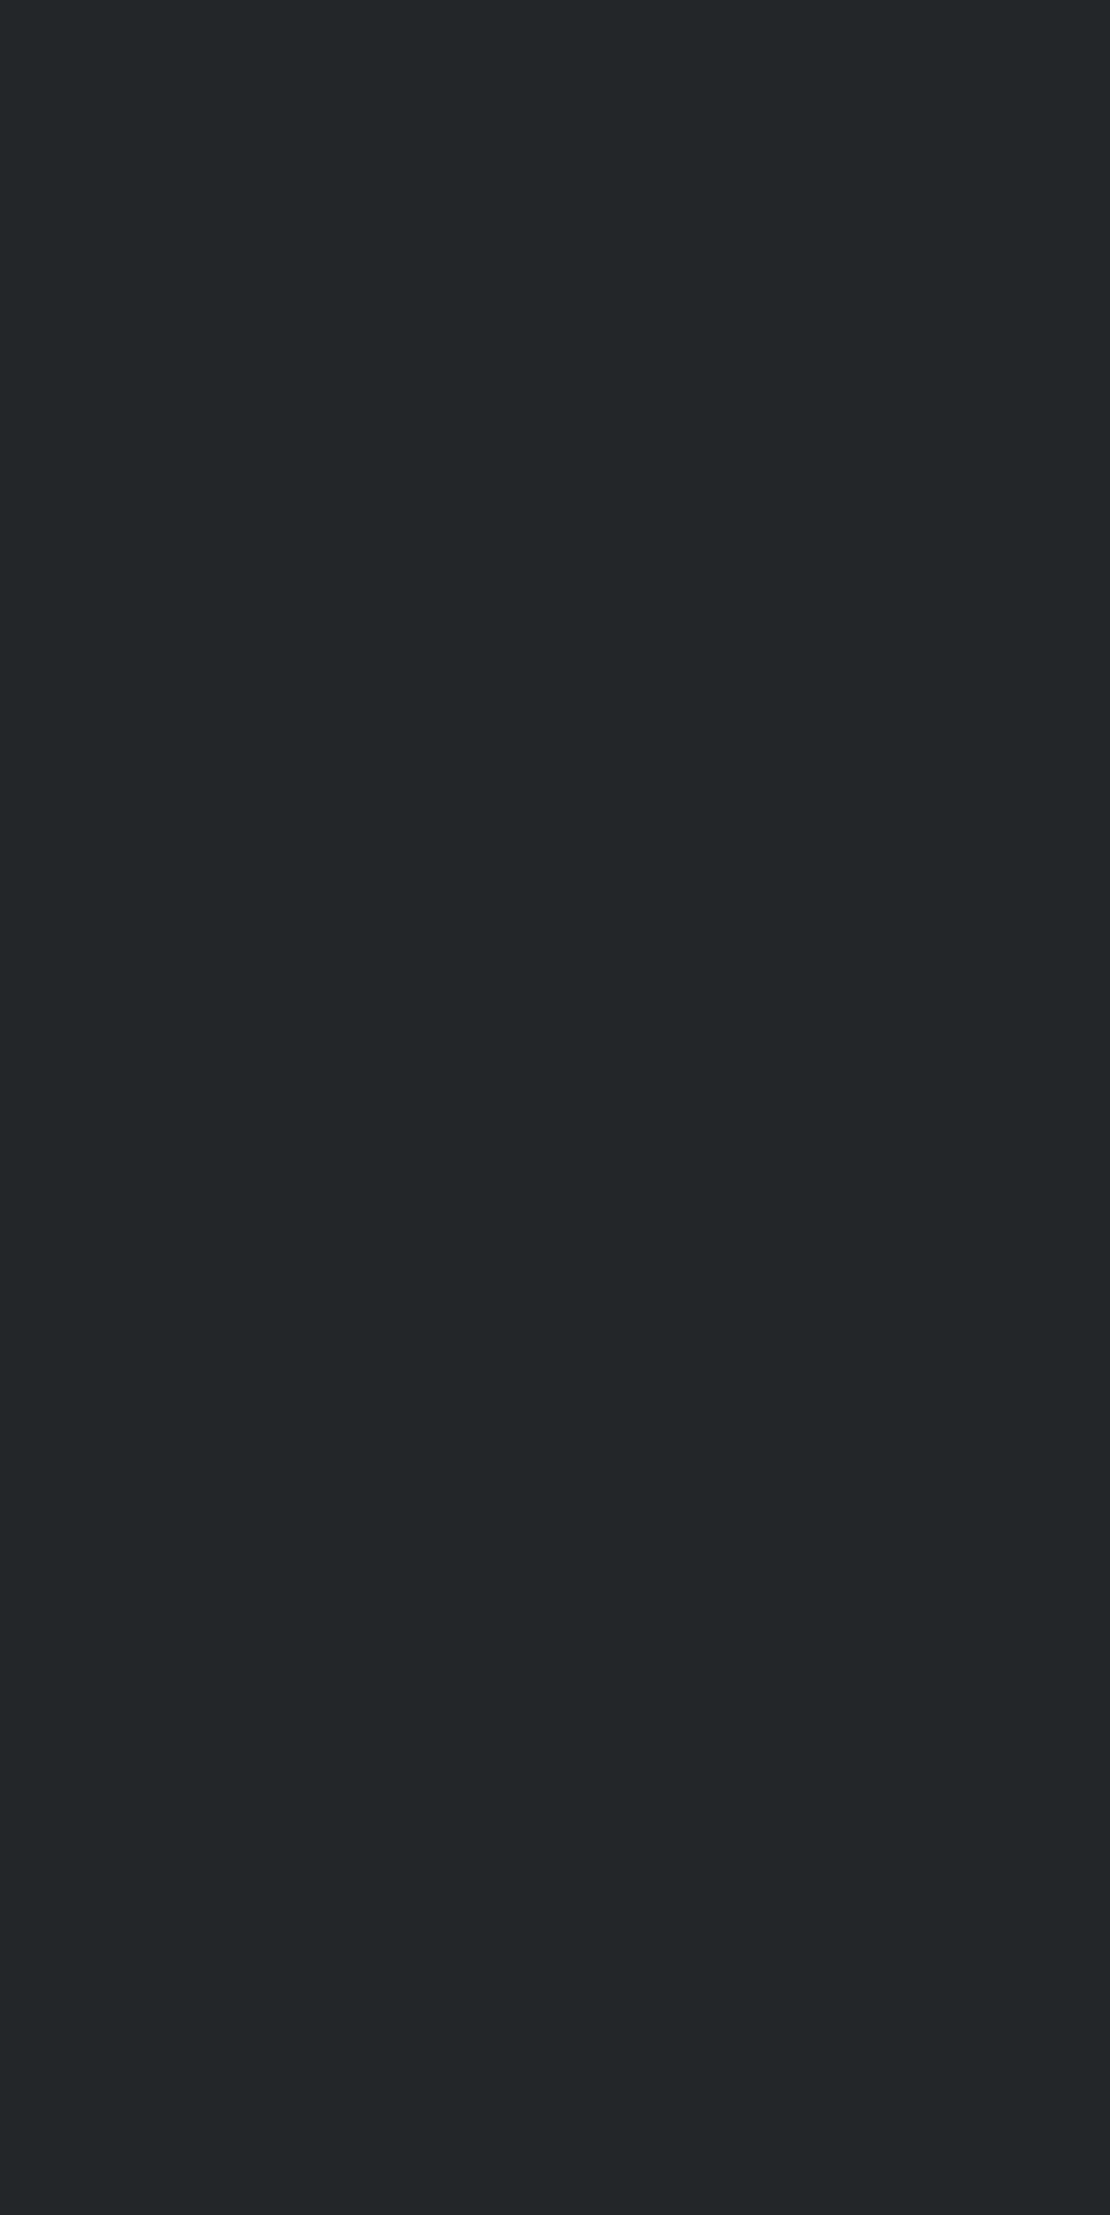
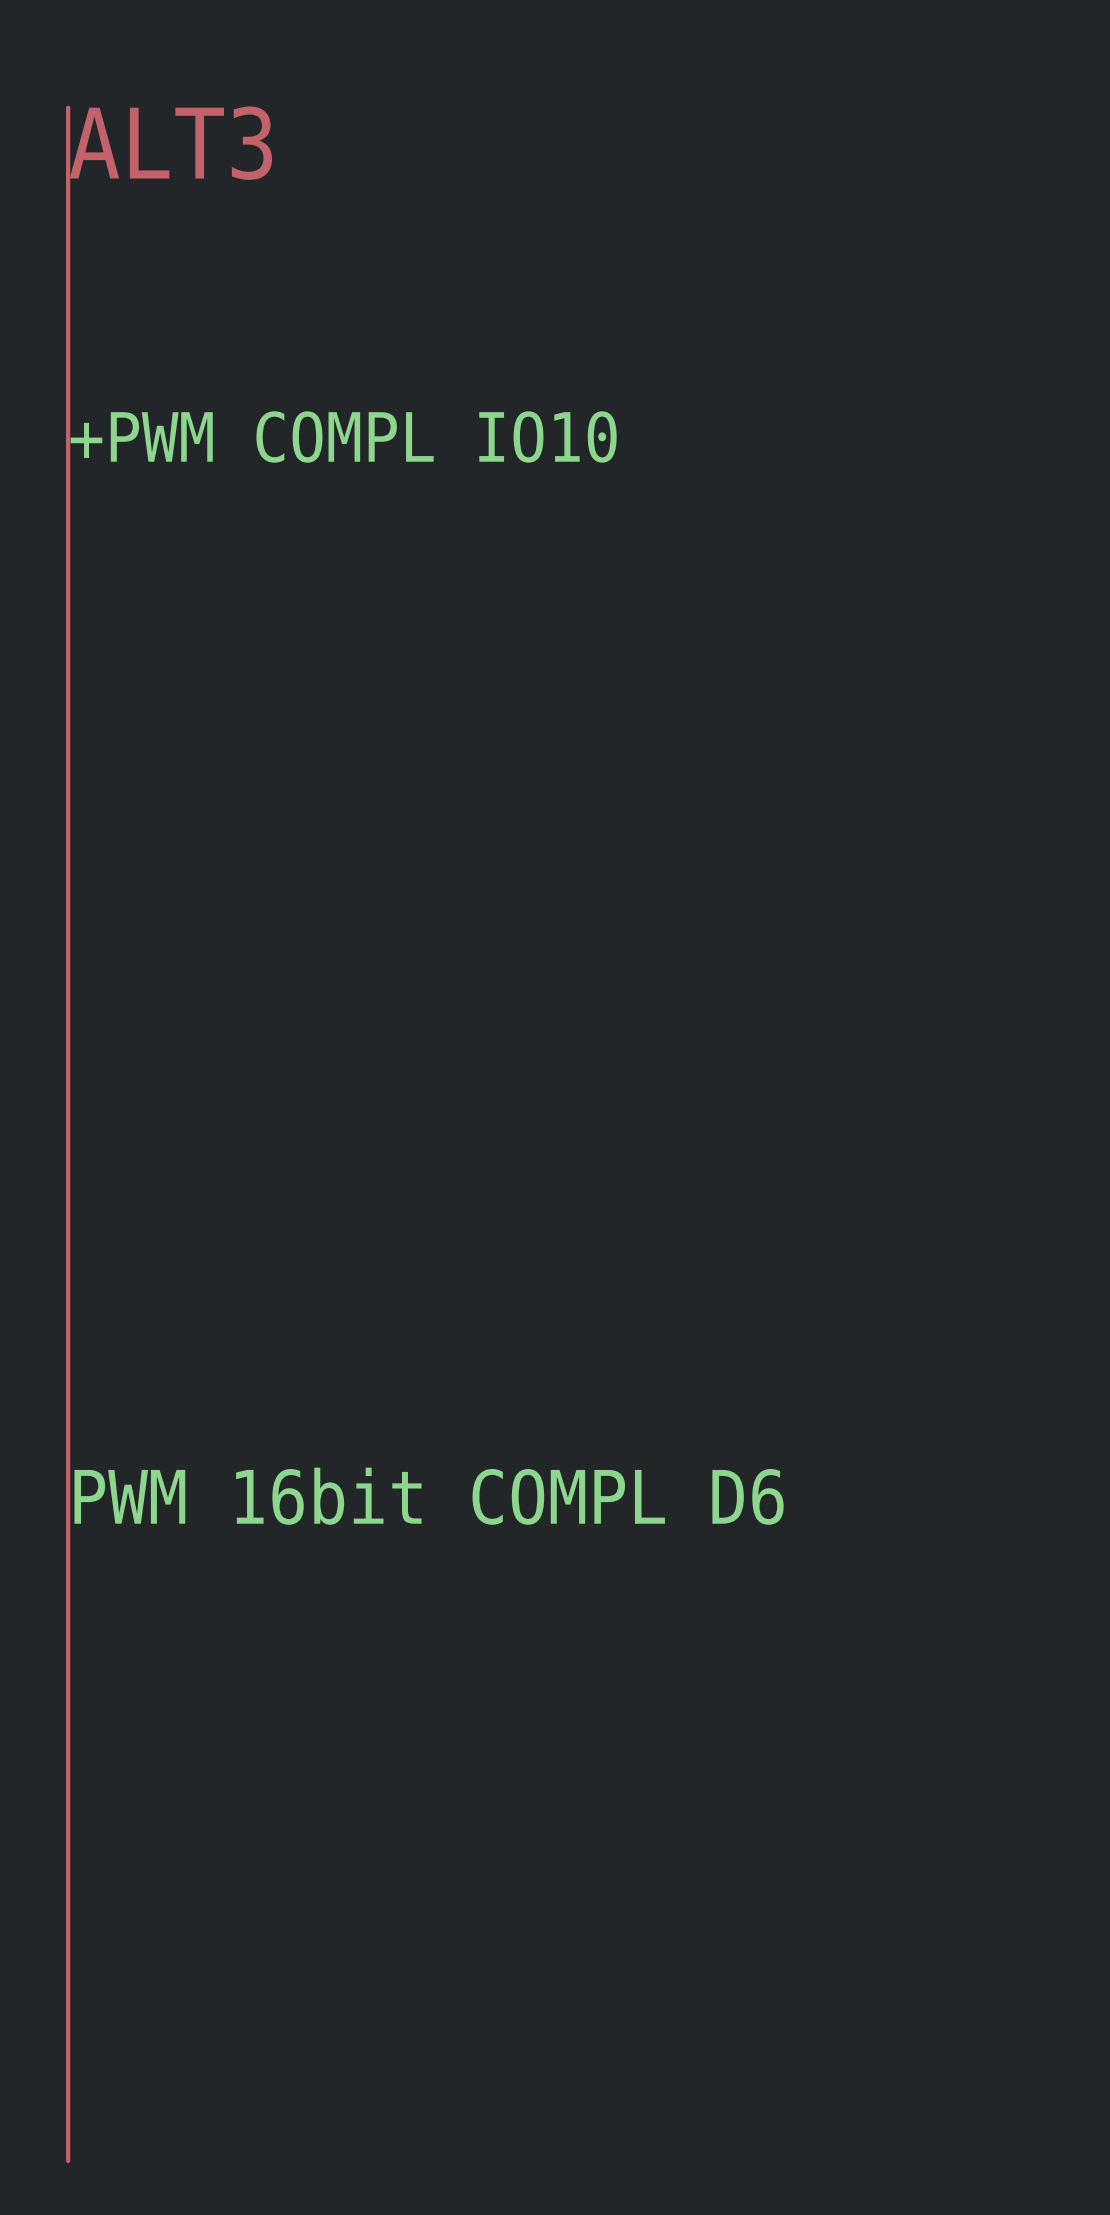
line: none -> (68, 107) (68, 2160)
text: none -> ALT3 (170, 143)
text: none -> +PWM COMPL IO10 (343, 436)
text: none -> PWM 16bit COMPL D6 (429, 1496)

